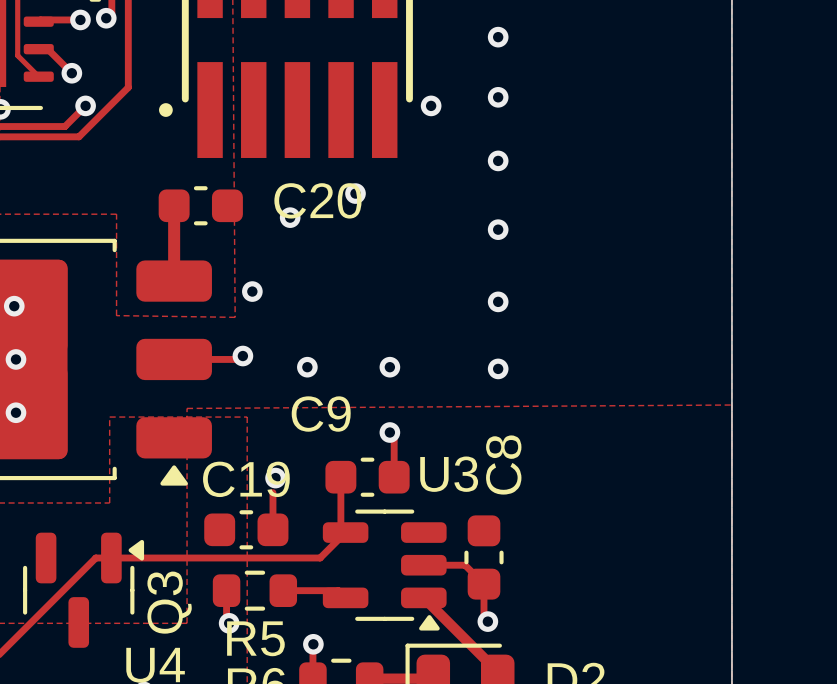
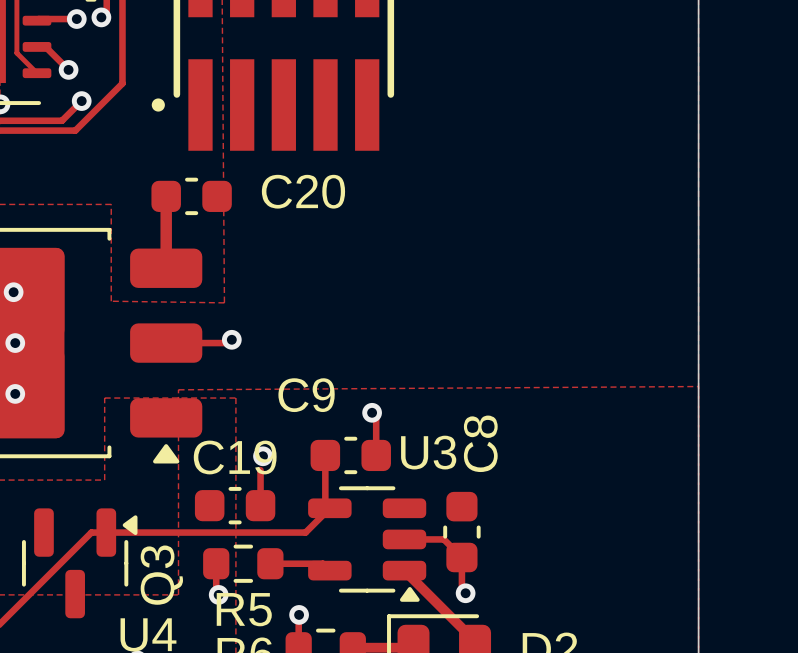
via: (498, 37) -> none
via: (498, 97) -> none
via: (431, 105) -> none
via: (498, 160) -> none
via: (355, 193) -> none
via: (290, 217) -> none
via: (498, 229) -> none
via: (252, 291) -> none
via: (498, 301) -> none
via: (307, 367) -> none
via: (389, 367) -> none
via: (498, 368) -> none

